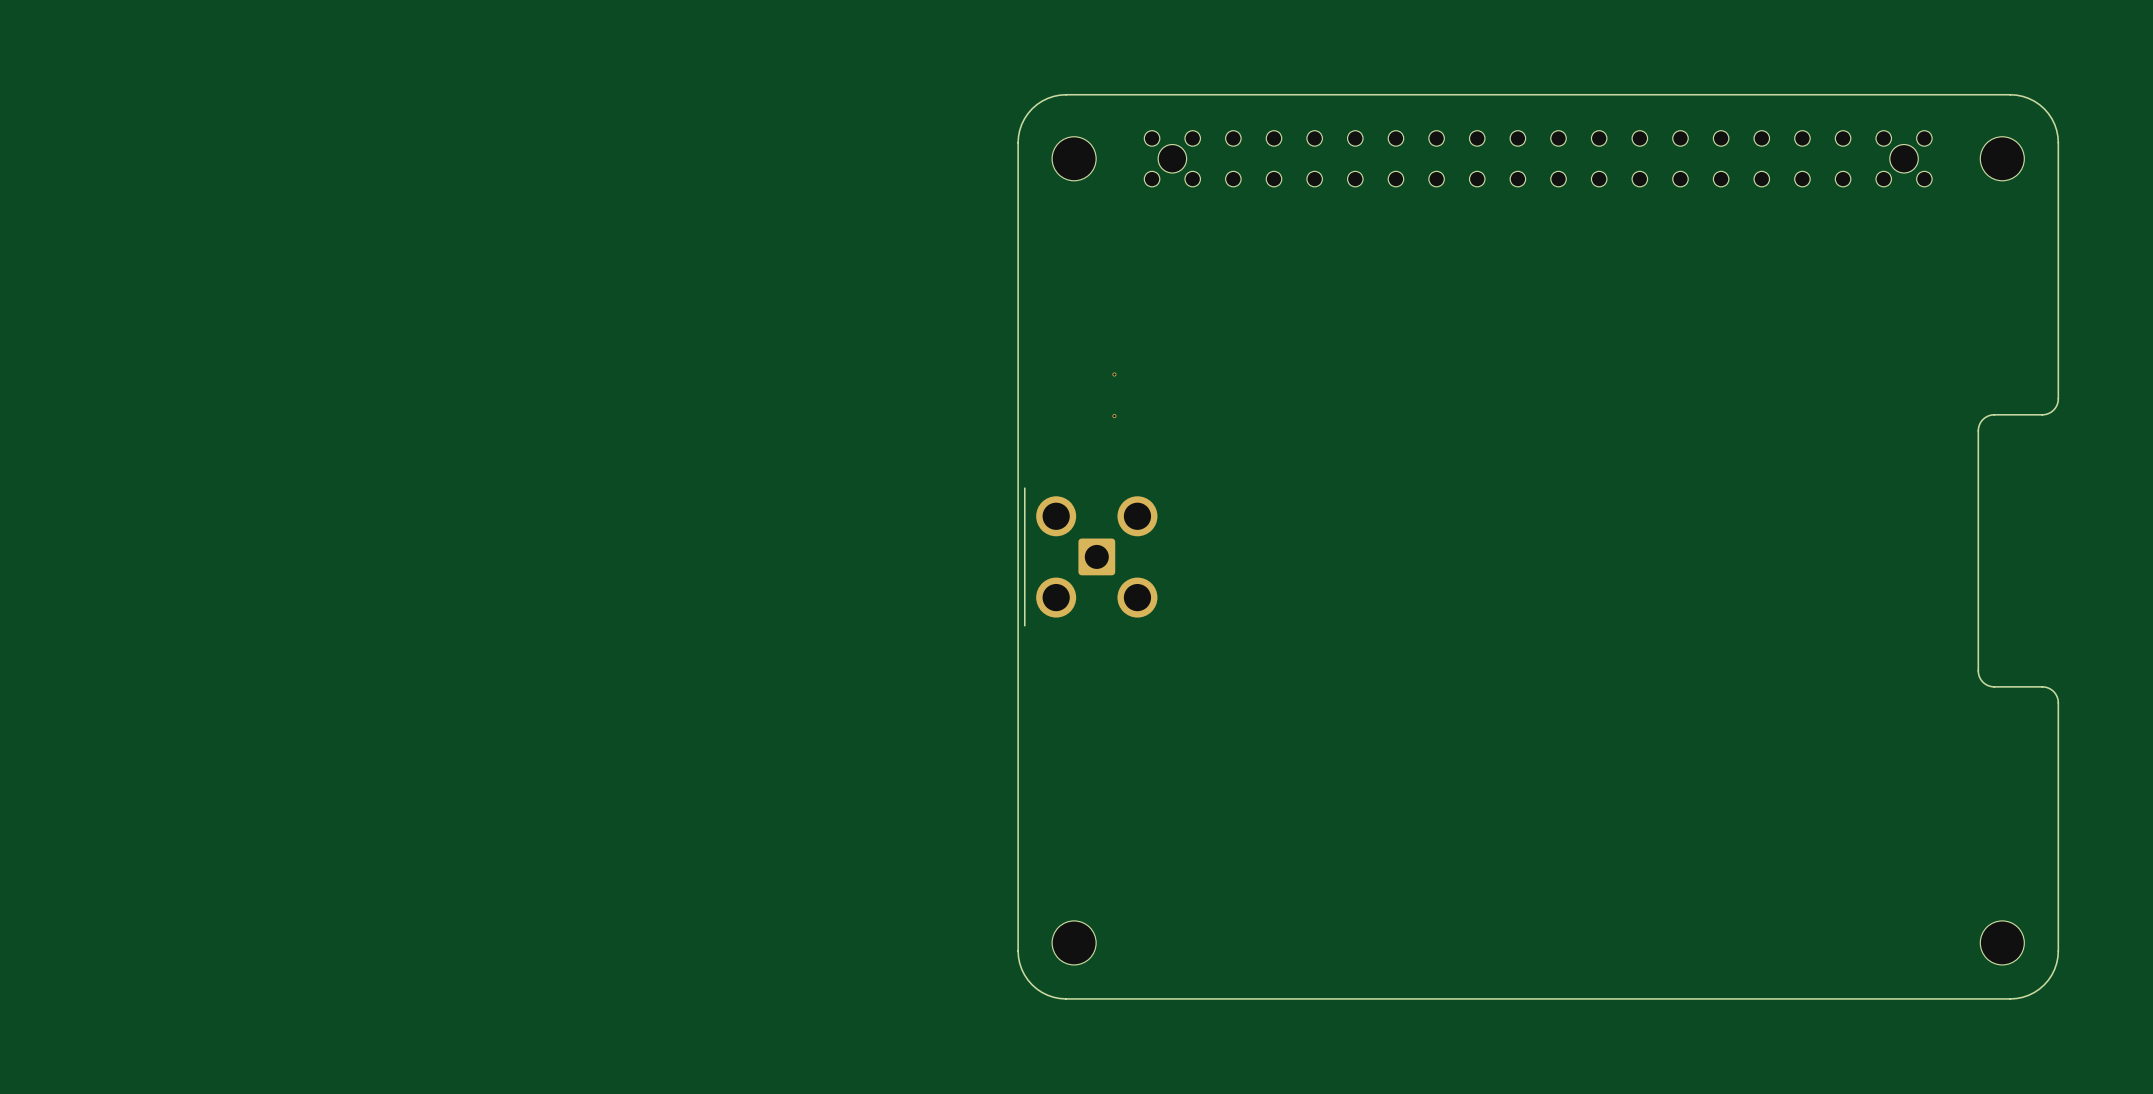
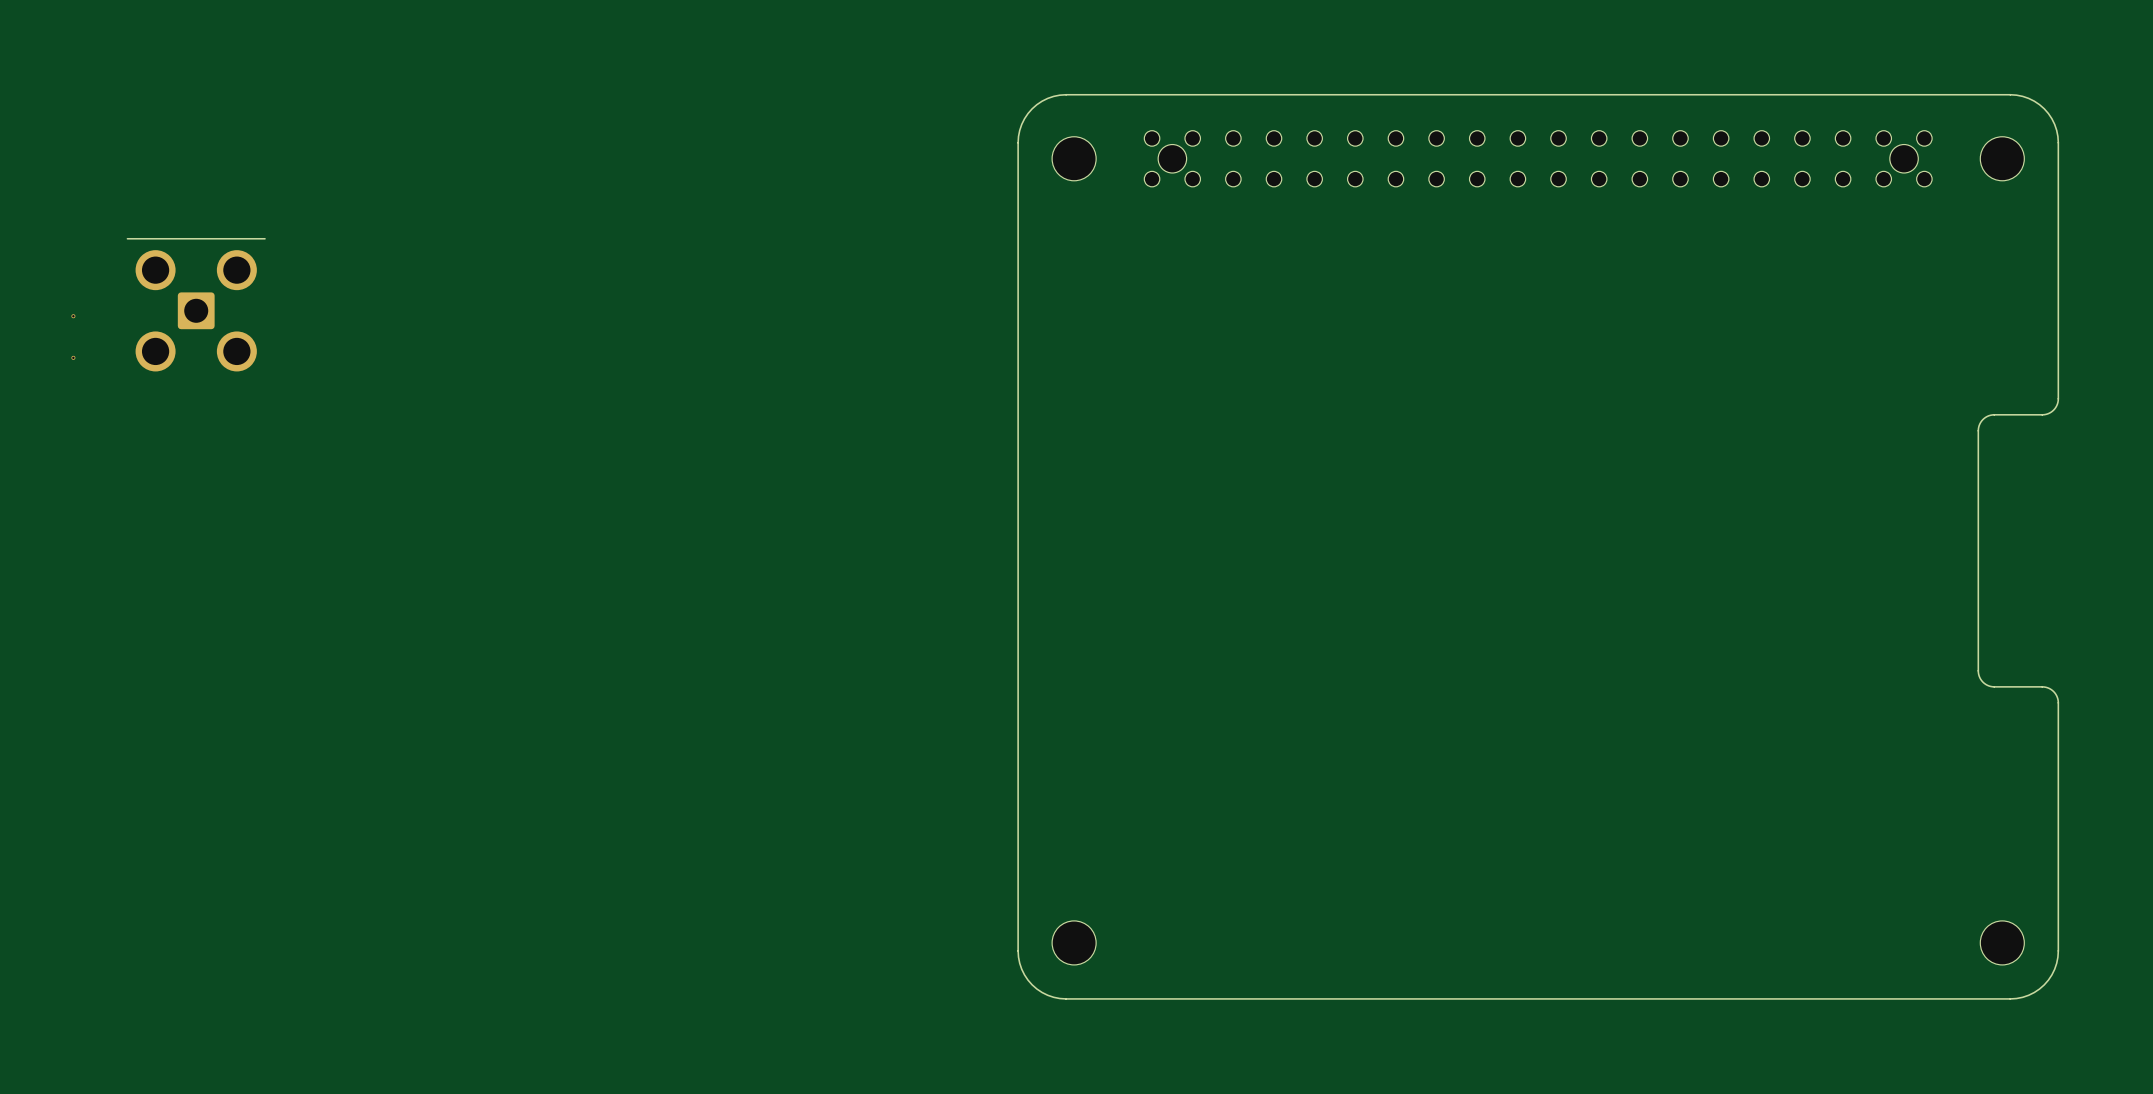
part: none -> (196, 304)
part: none -> (73, 337)
part: (1114, 395) -> none
part: (1090, 556) -> none

